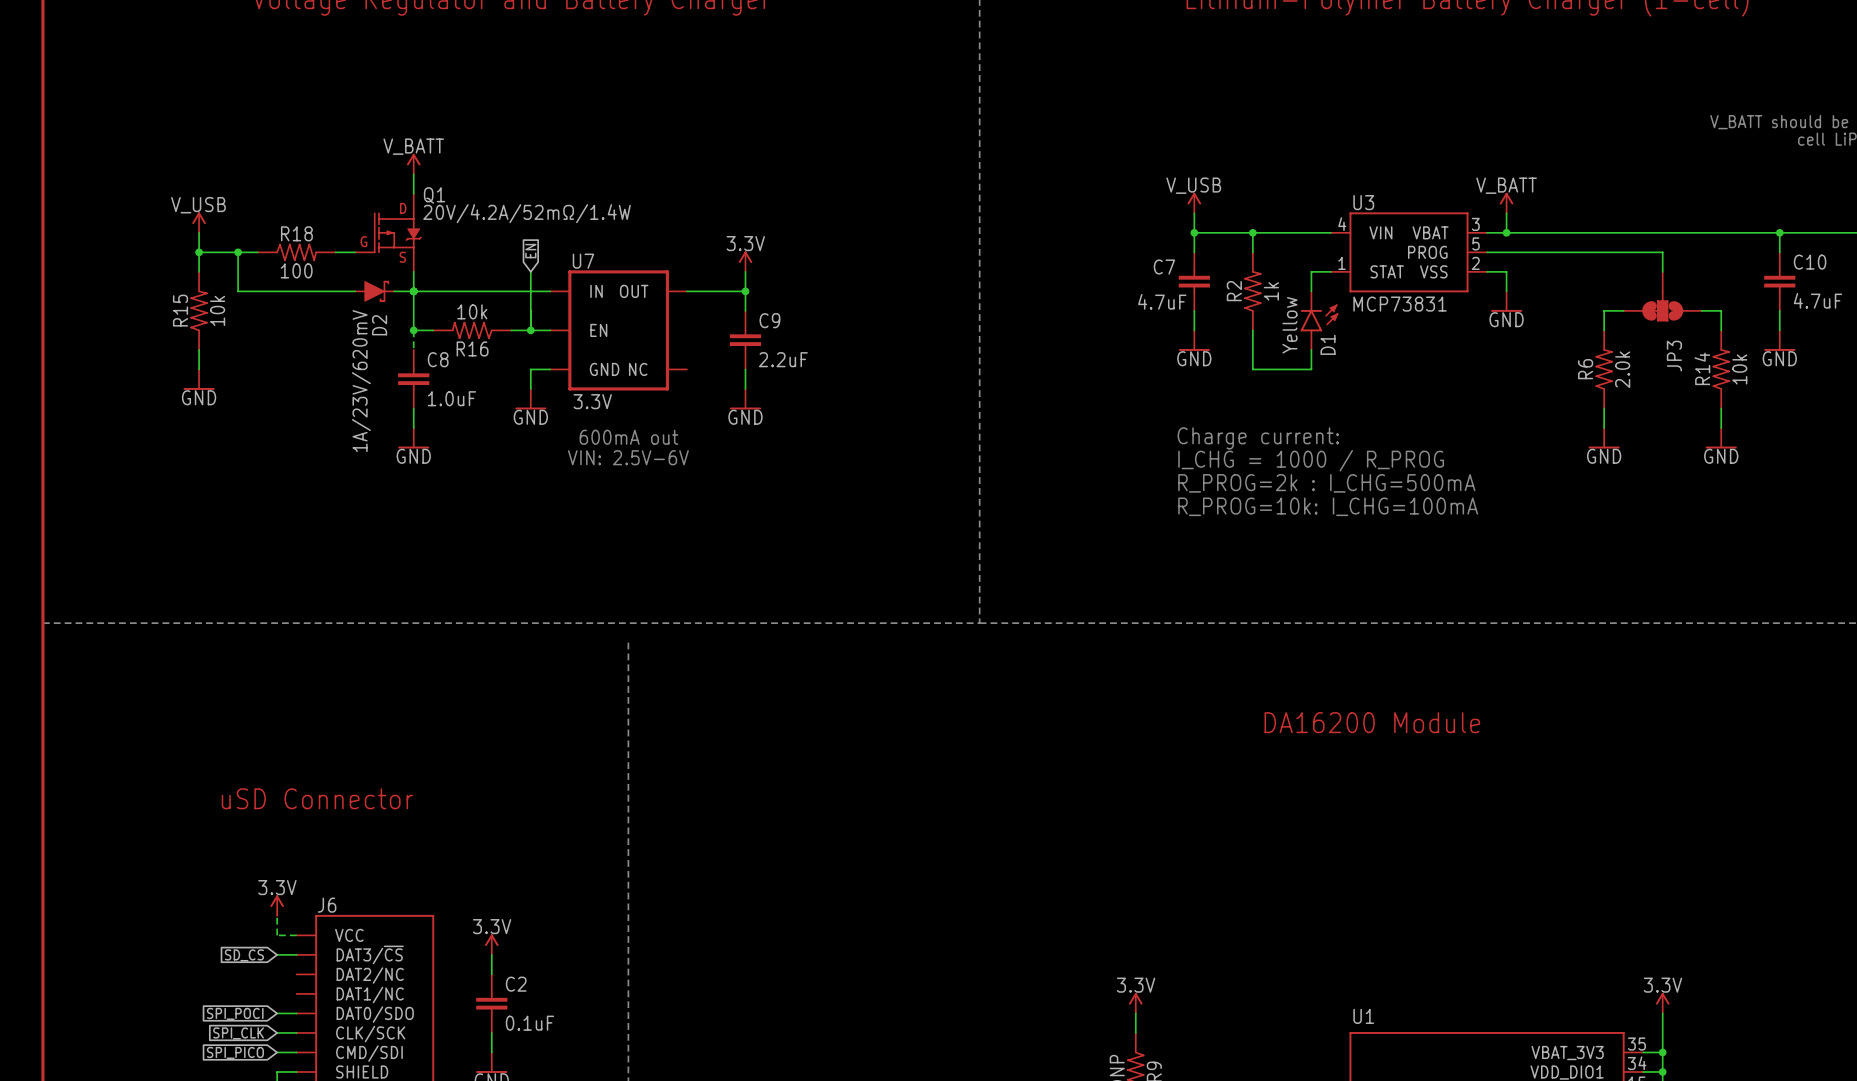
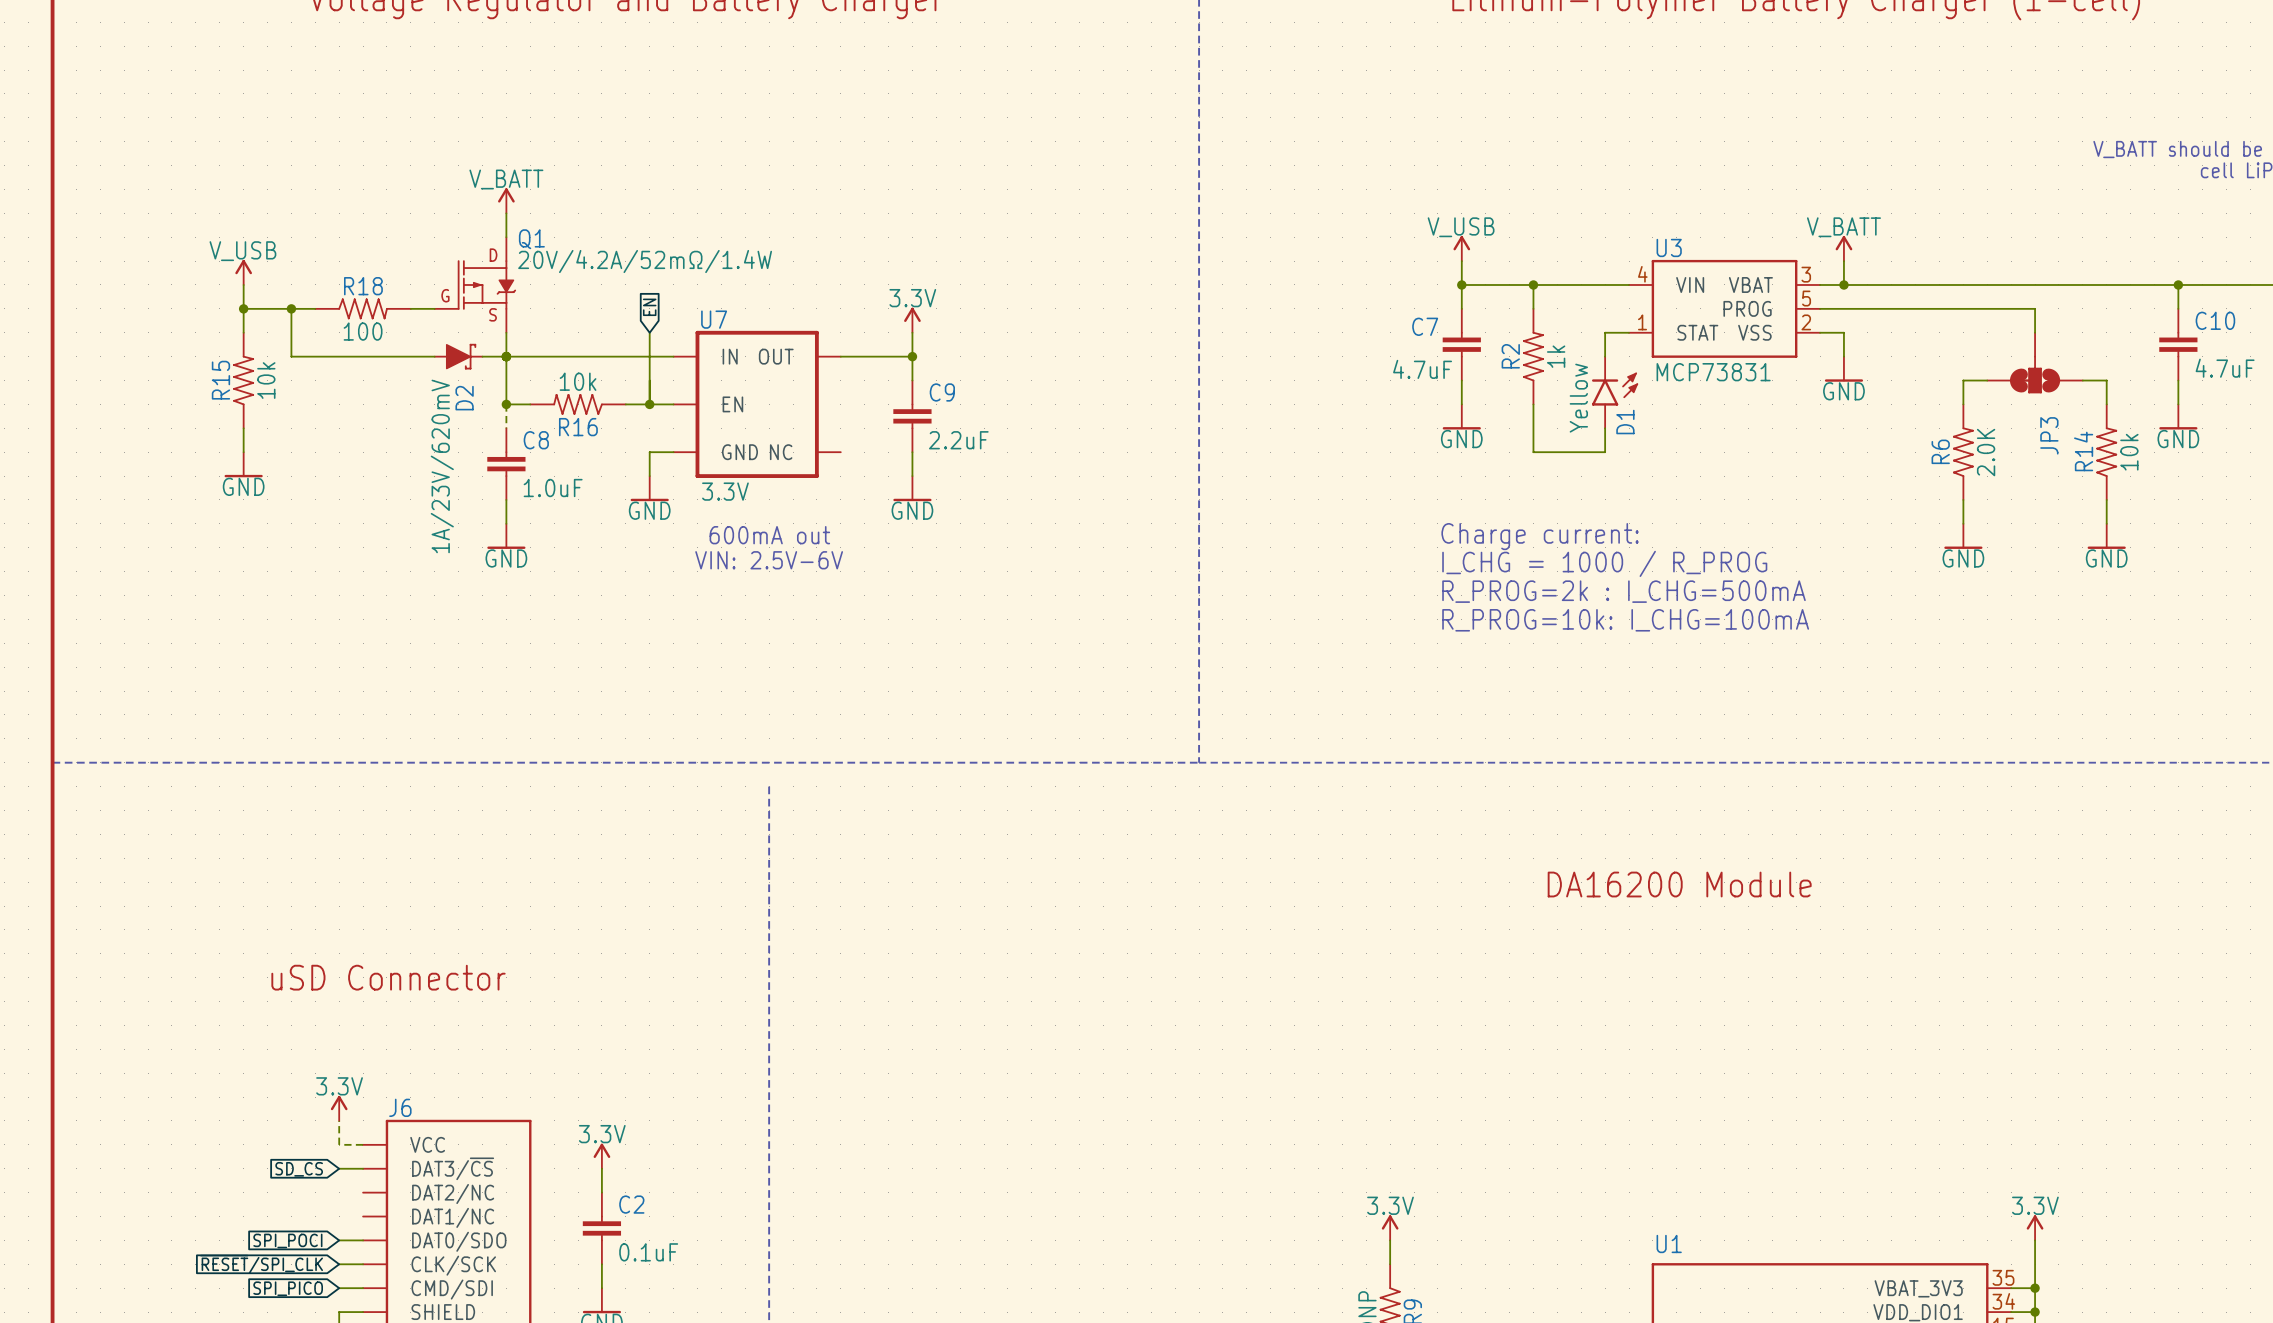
R6 value: 2.0k (1622, 369) -> 2.0K (1986, 452)
global label: SPI_CLK (238, 1033) -> ~{RESET}/SPI_CLK (261, 1264)

